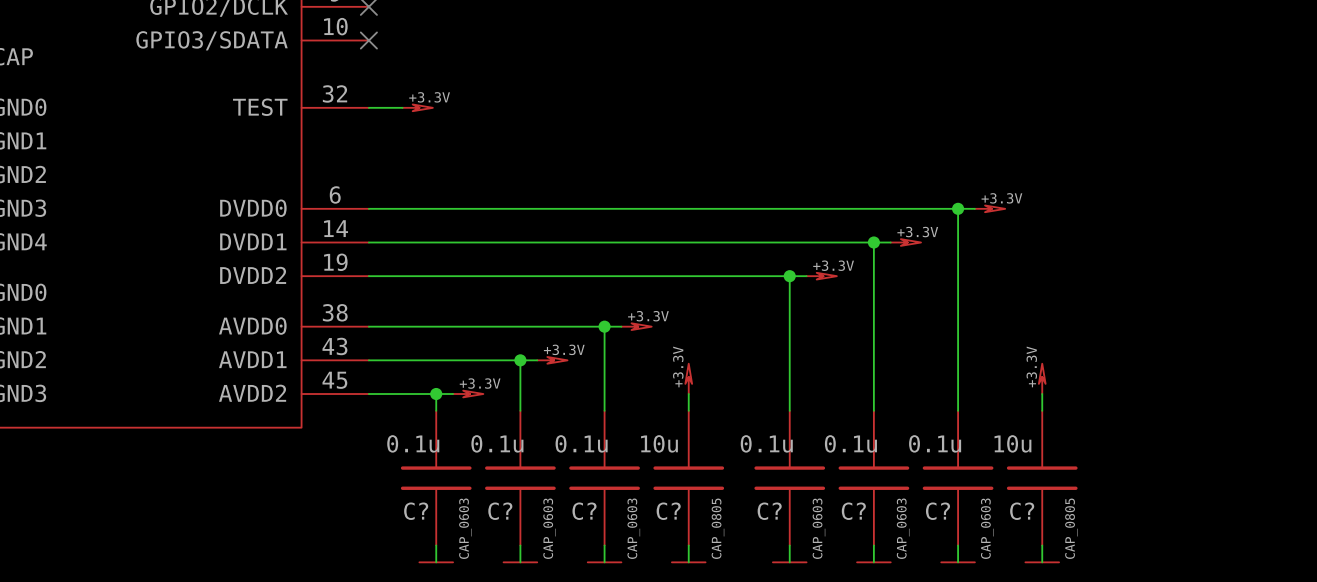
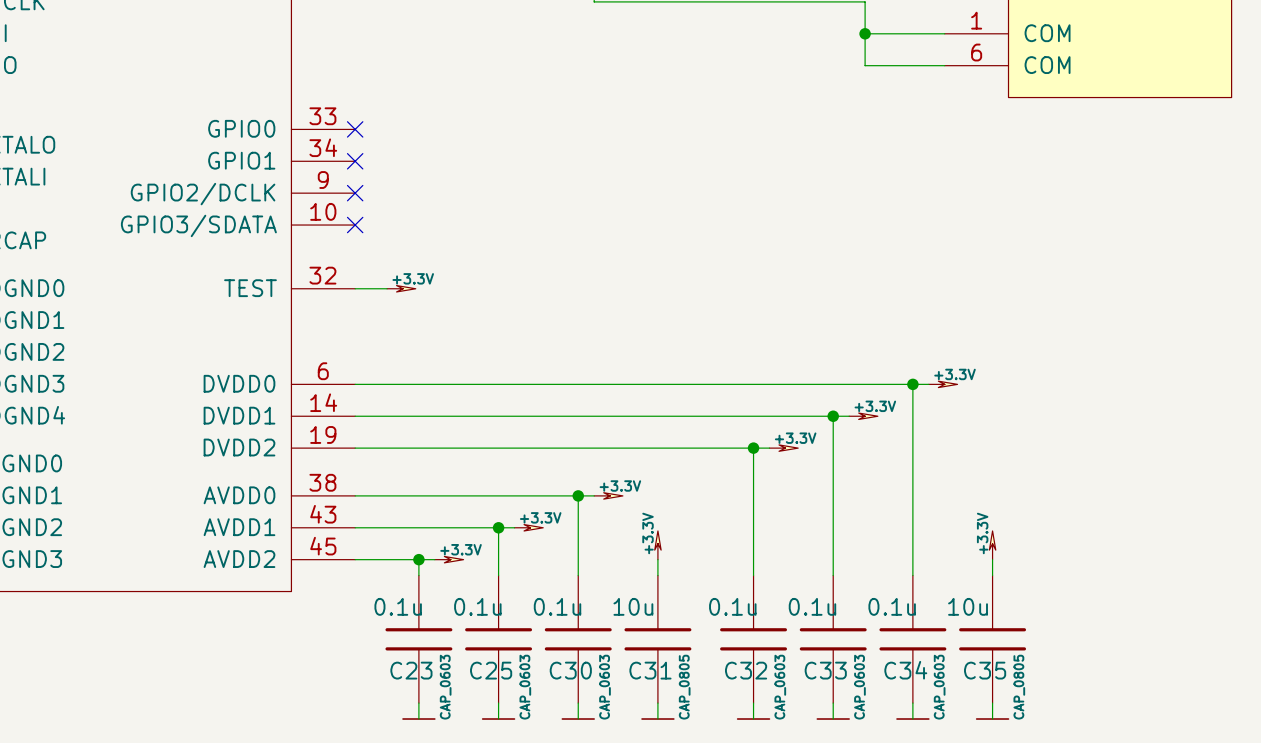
C? name: C? (416, 511) -> C23 (411, 670)
C? name: C? (500, 511) -> C25 (491, 670)
C? name: C? (584, 511) -> C30 (570, 670)
C? name: C? (668, 511) -> C31 (650, 670)
C? name: C? (769, 511) -> C32 (746, 670)
C? name: C? (853, 511) -> C33 (825, 670)
C? name: C? (938, 511) -> C34 (905, 670)
C? name: C? (1022, 511) -> C35 (985, 670)

